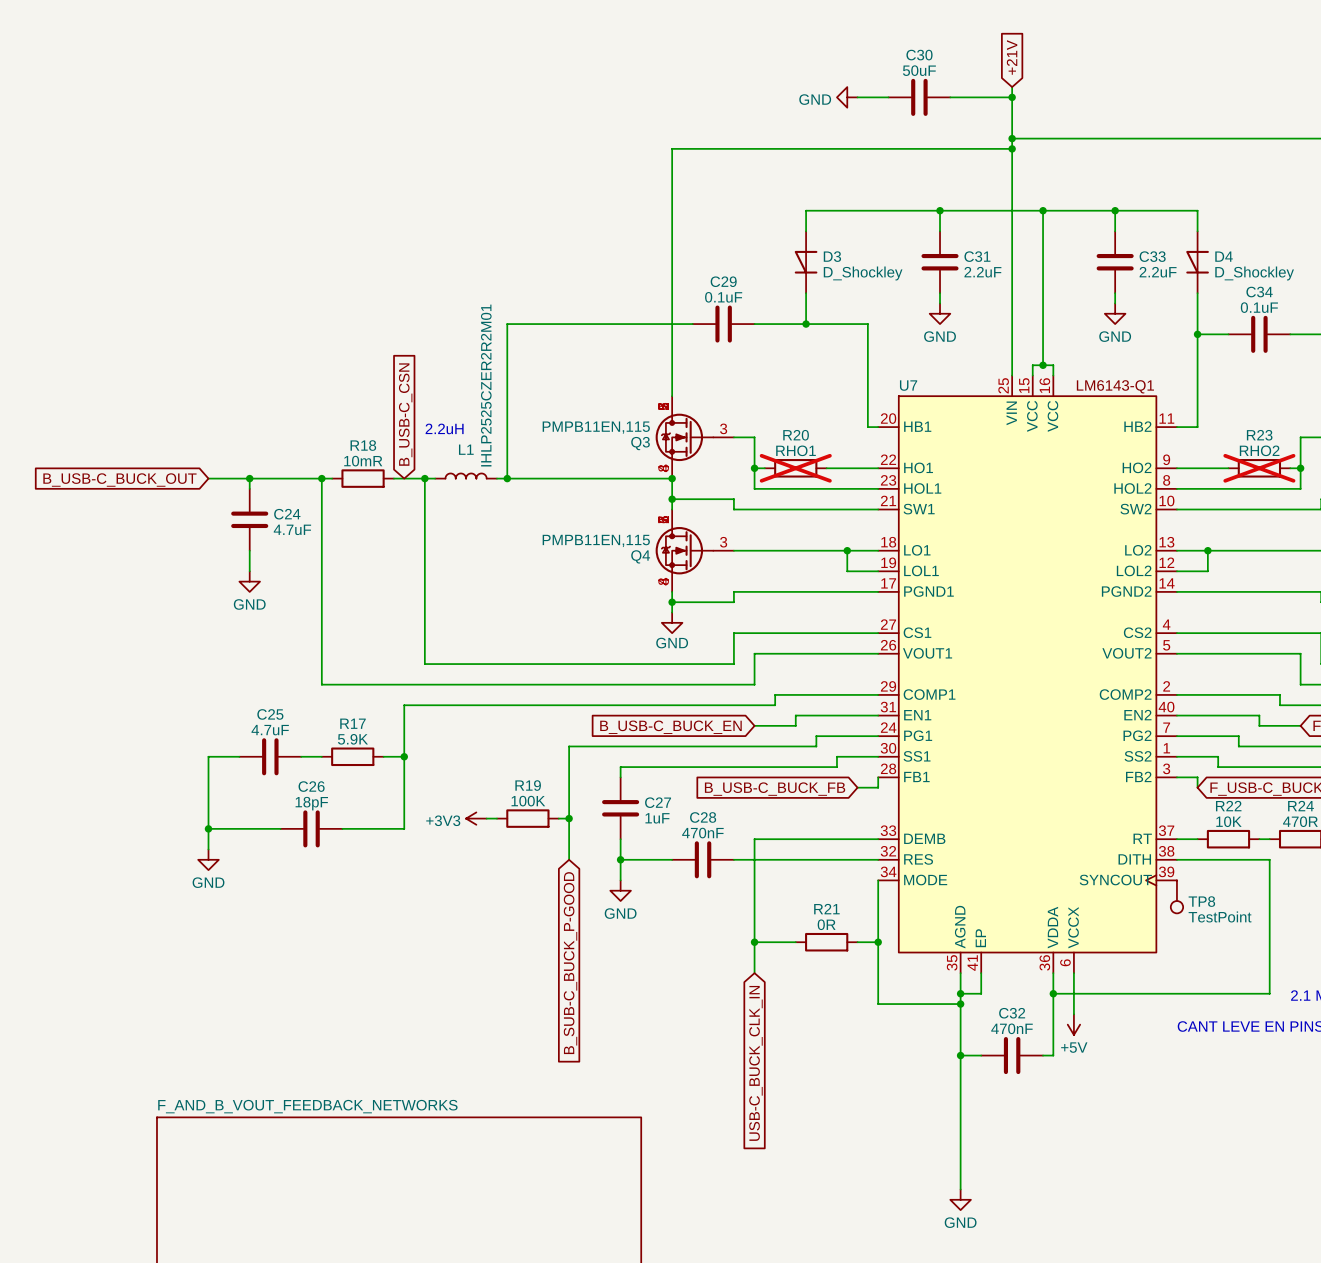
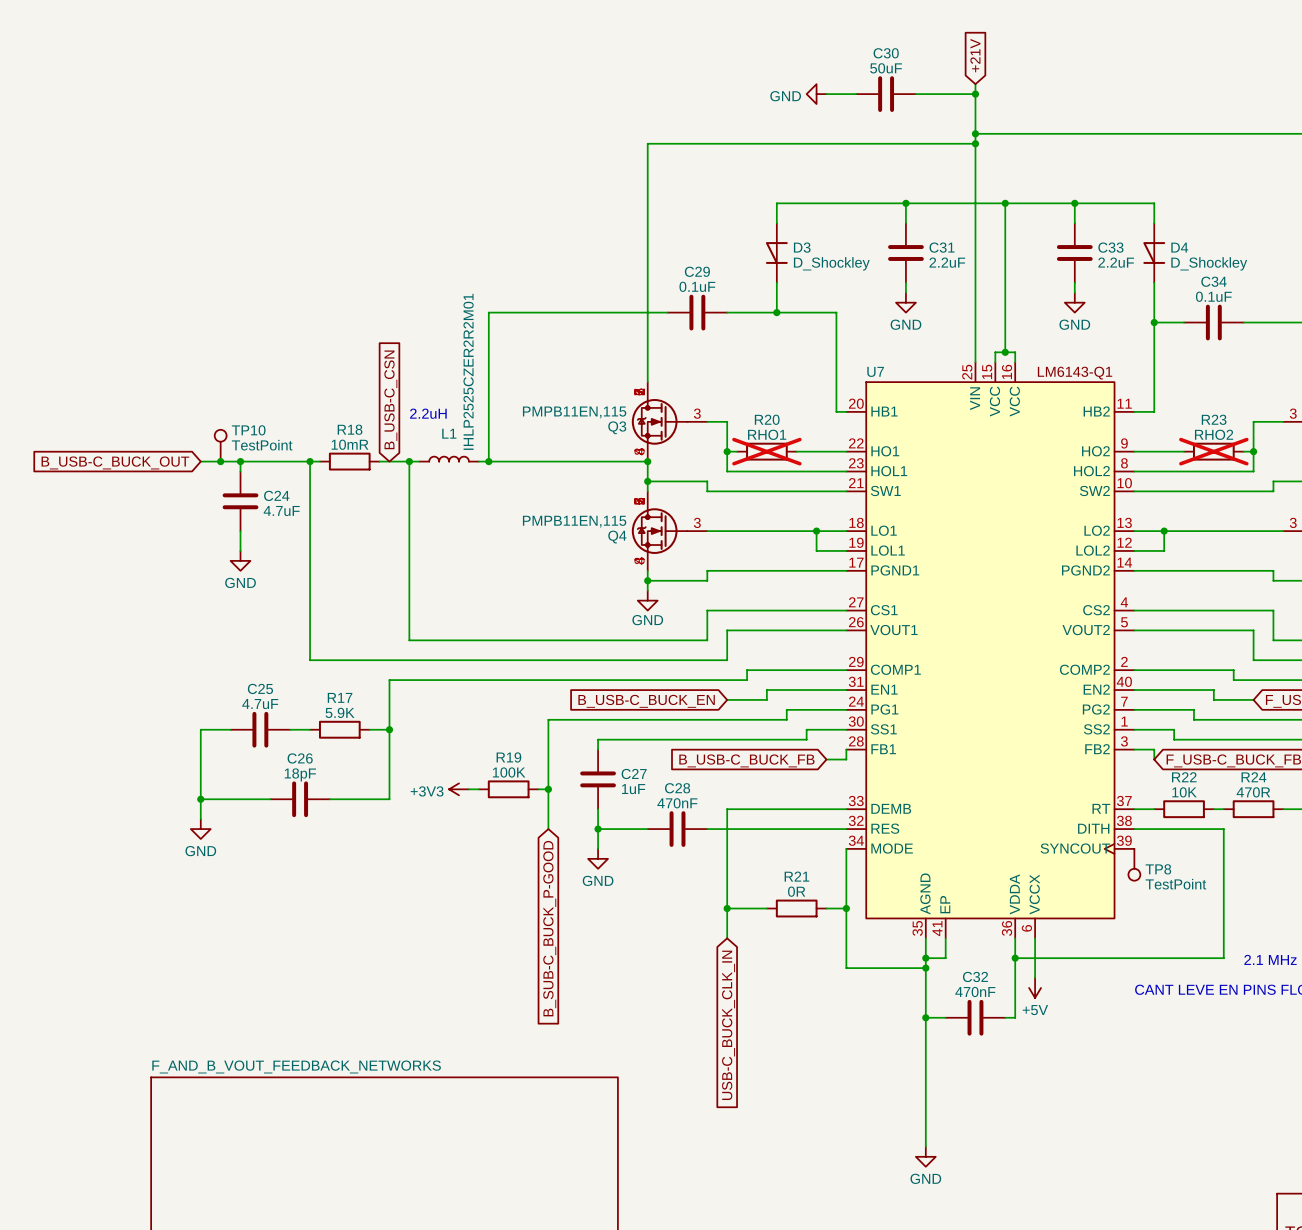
TP10: none -> TestPoint (220, 445)
junction: none -> (220, 461)

